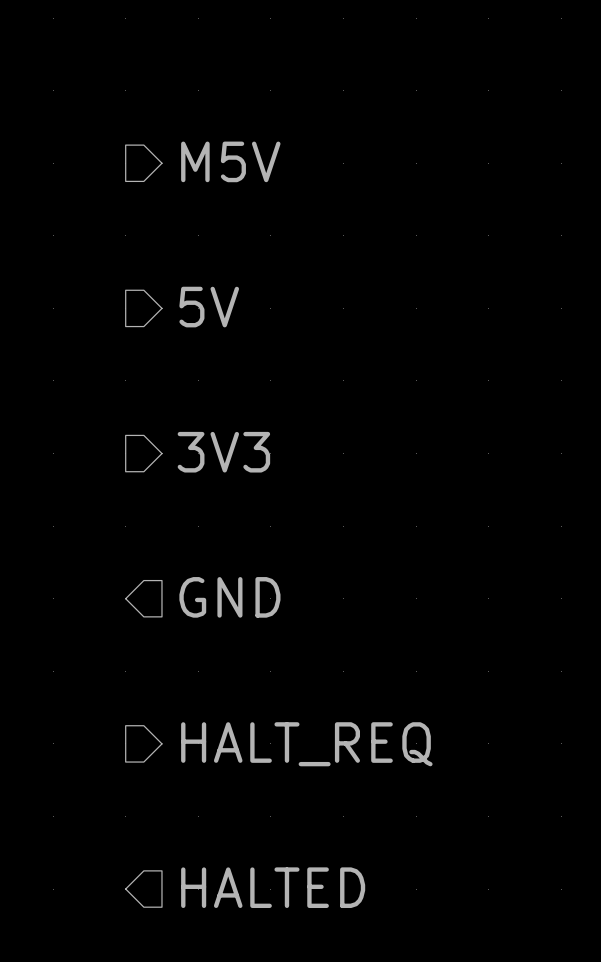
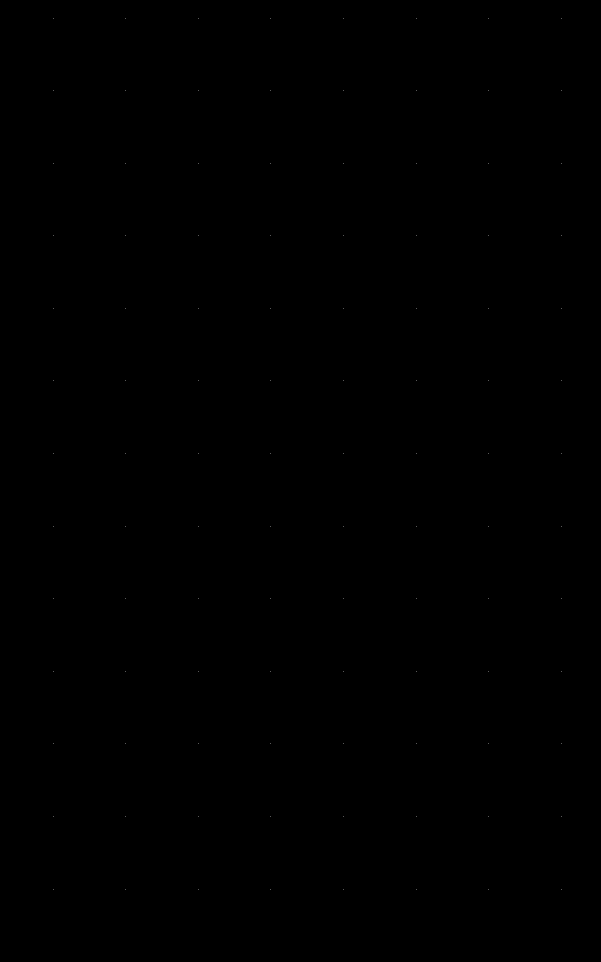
hierarchical label: M5V (230, 161) -> none
hierarchical label: 5V (209, 307) -> none
hierarchical label: 3V3 (223, 452) -> none
hierarchical label: GND (229, 597) -> none
hierarchical label: HALT_REQ (306, 744) -> none
hierarchical label: HALTED (273, 887) -> none

